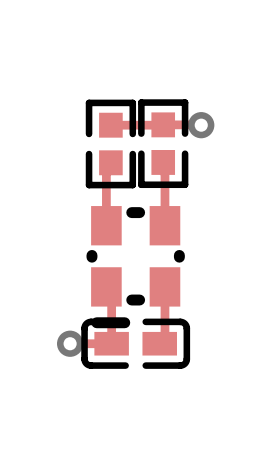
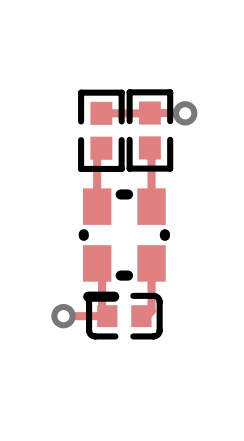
part footprint: [81, 318, 191, 369] -> [86, 292, 163, 340]

